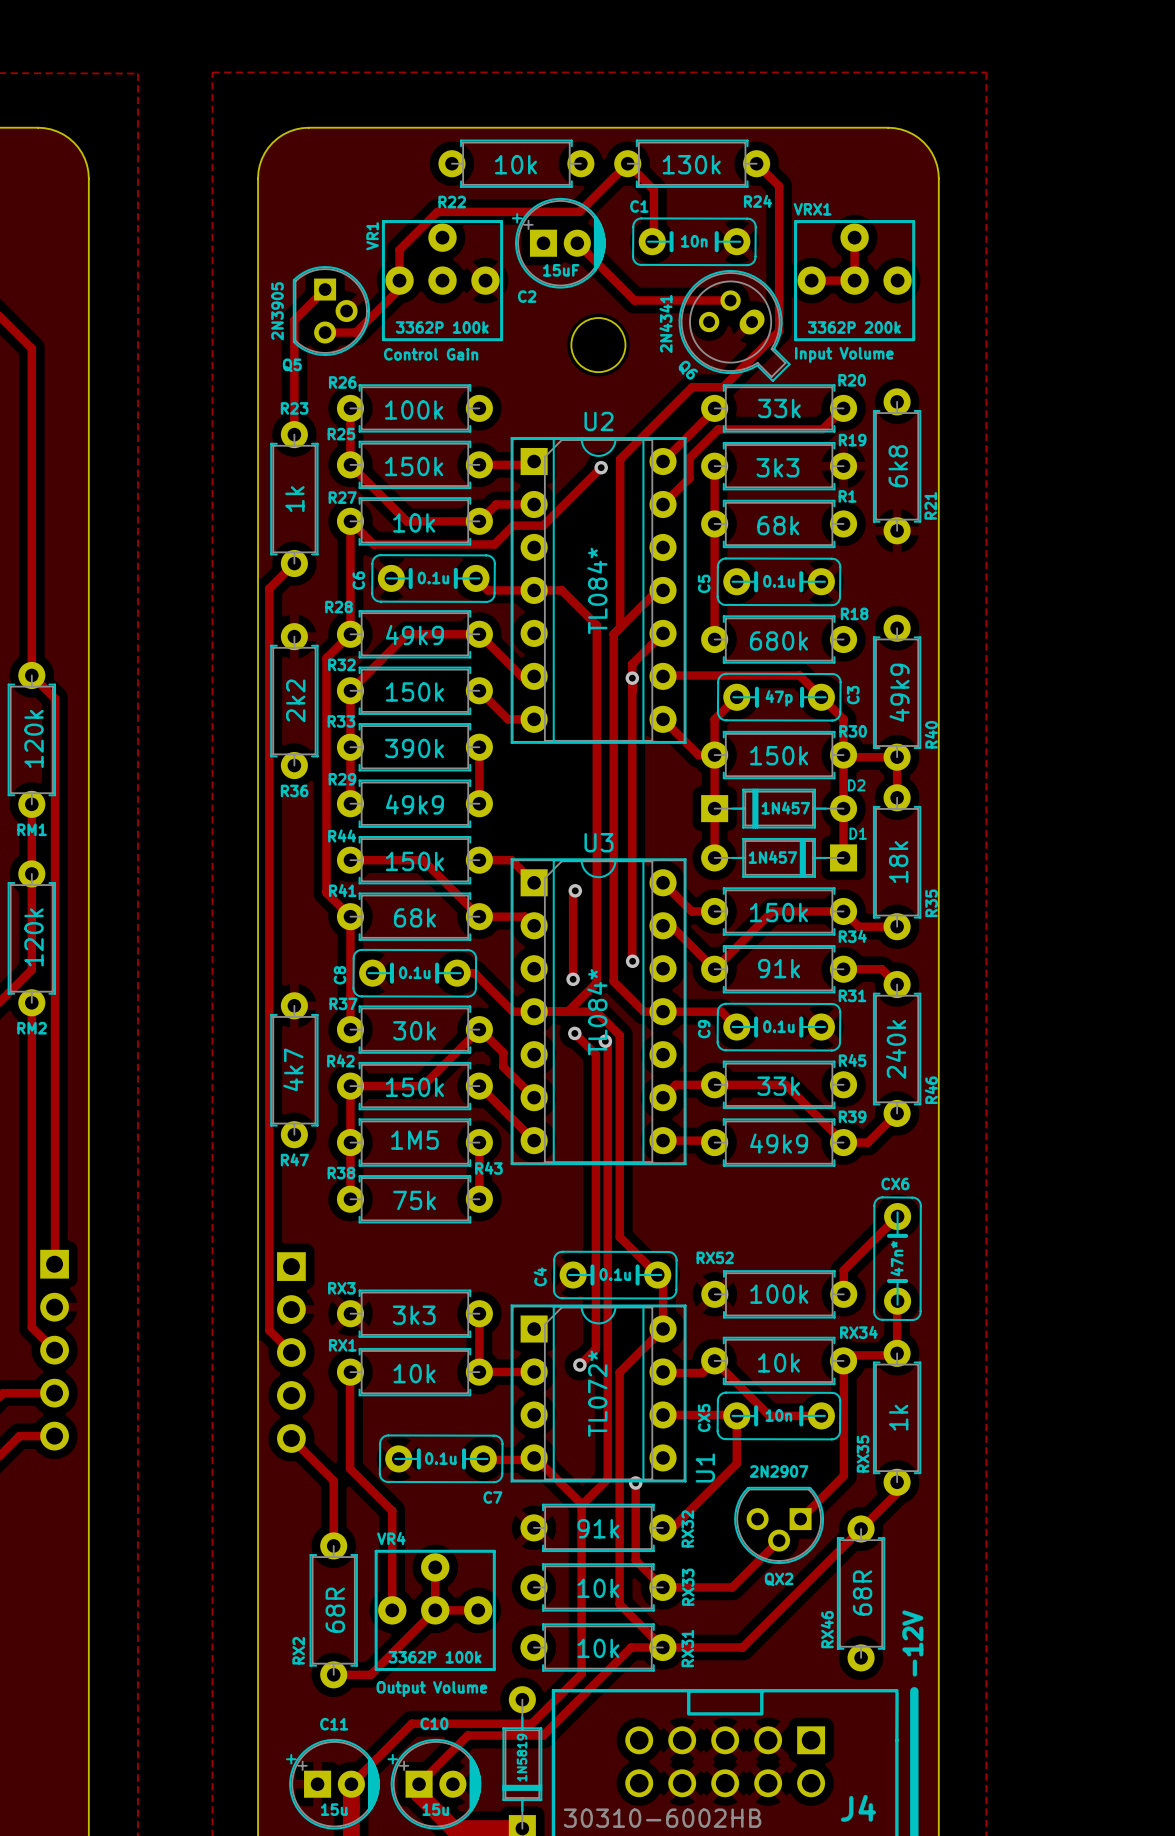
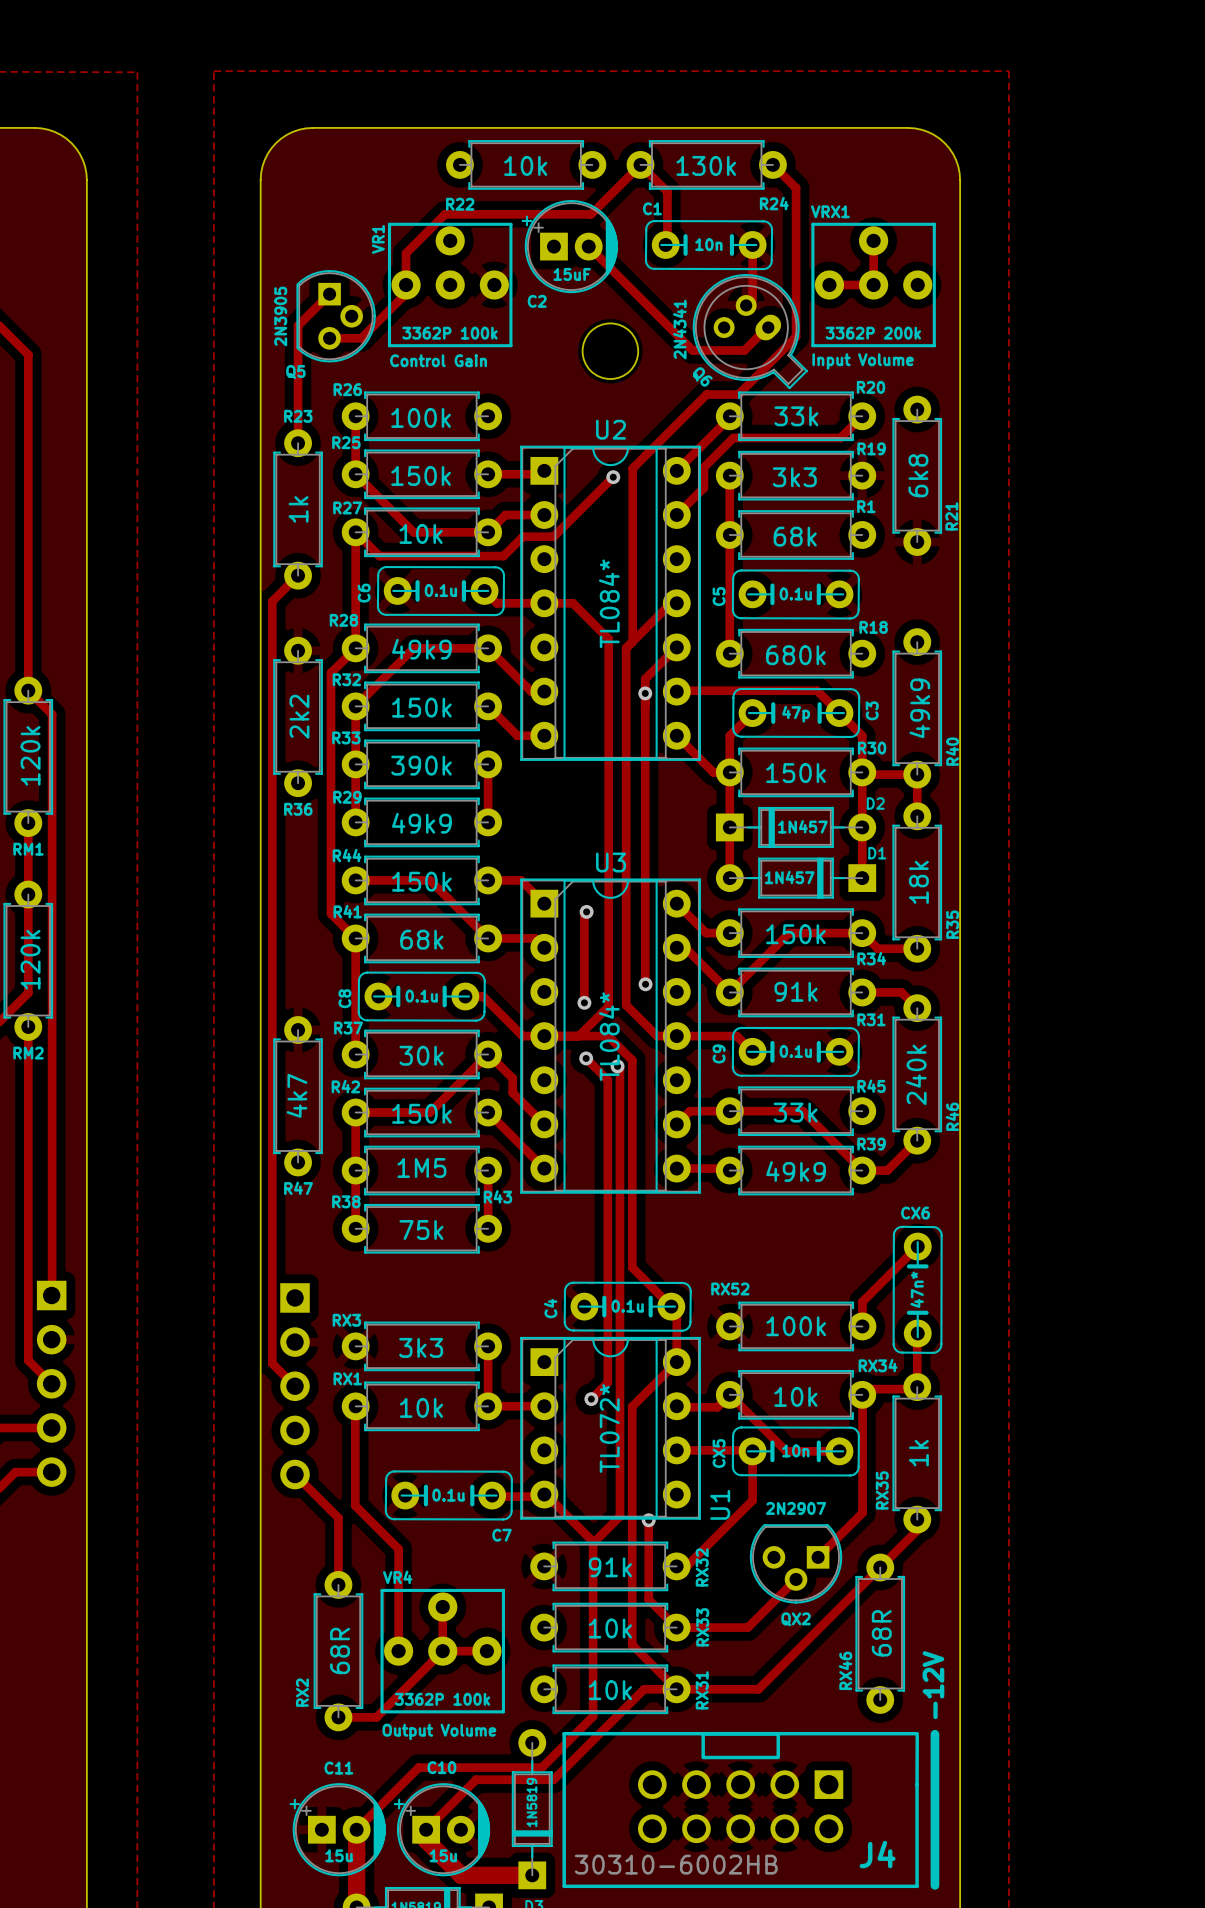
track: none -> (752, 244) (752, 299) (746, 305)
track: (634, 300) (730, 300) -> (647, 305) (692, 350) (744, 350) (767, 327)

